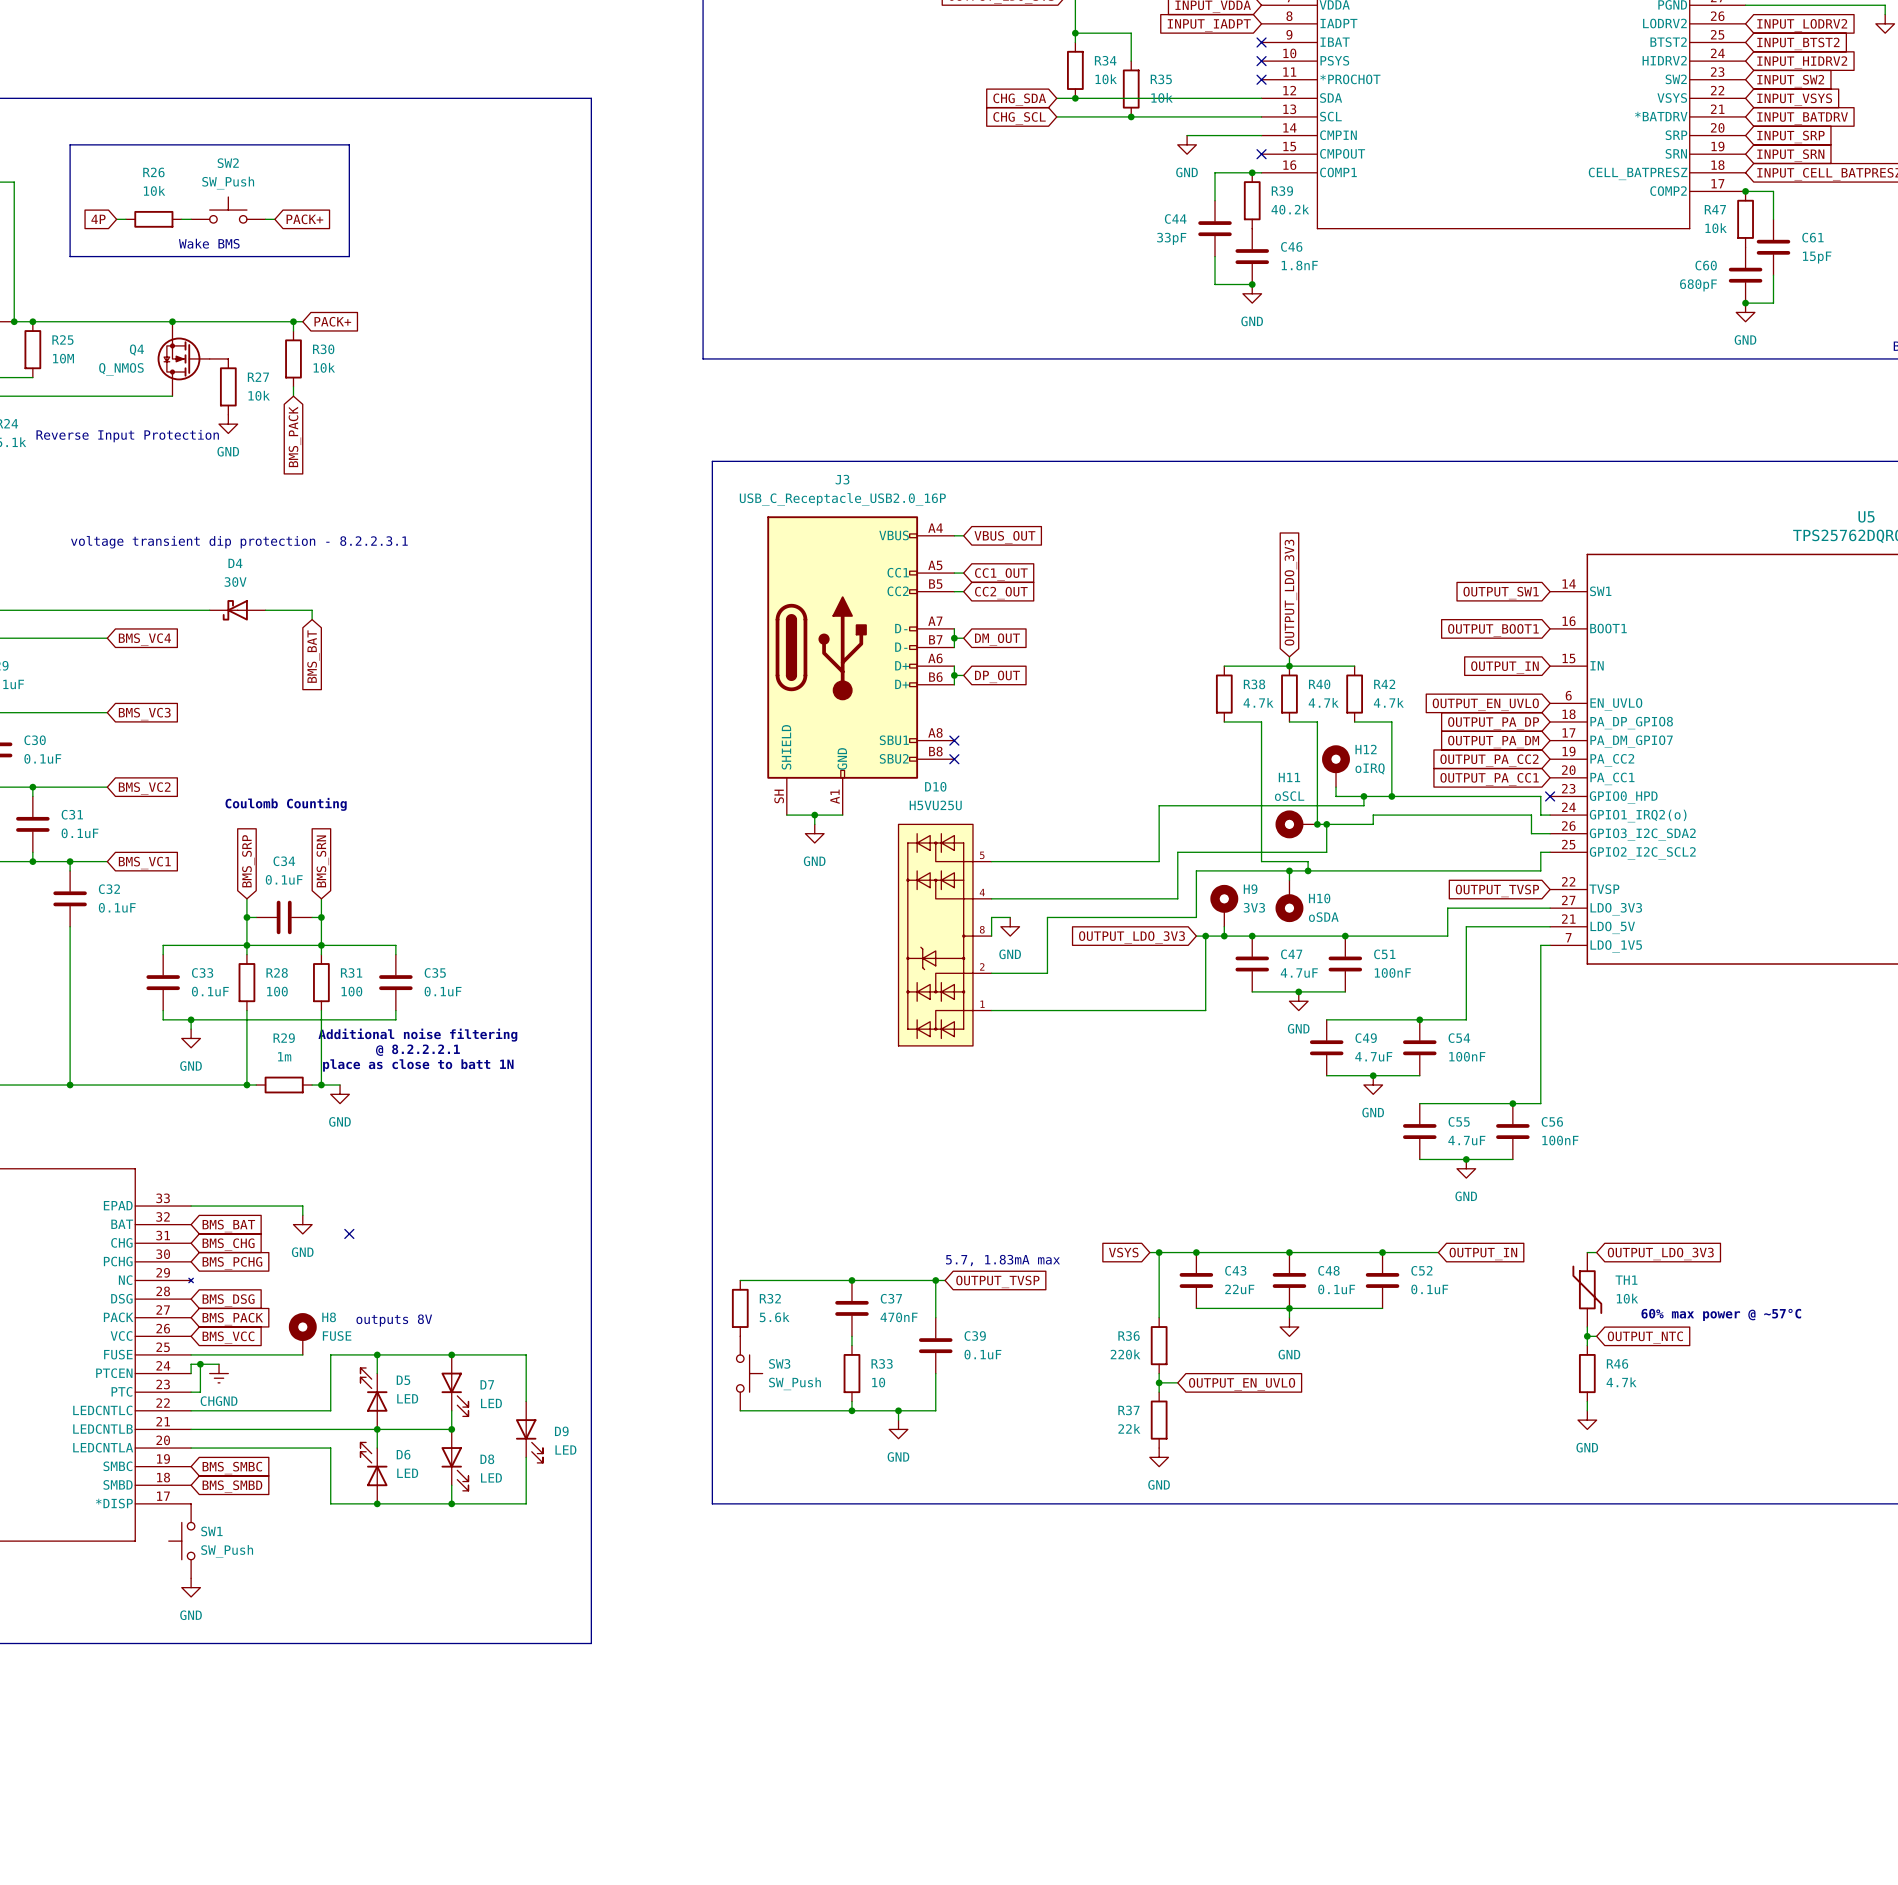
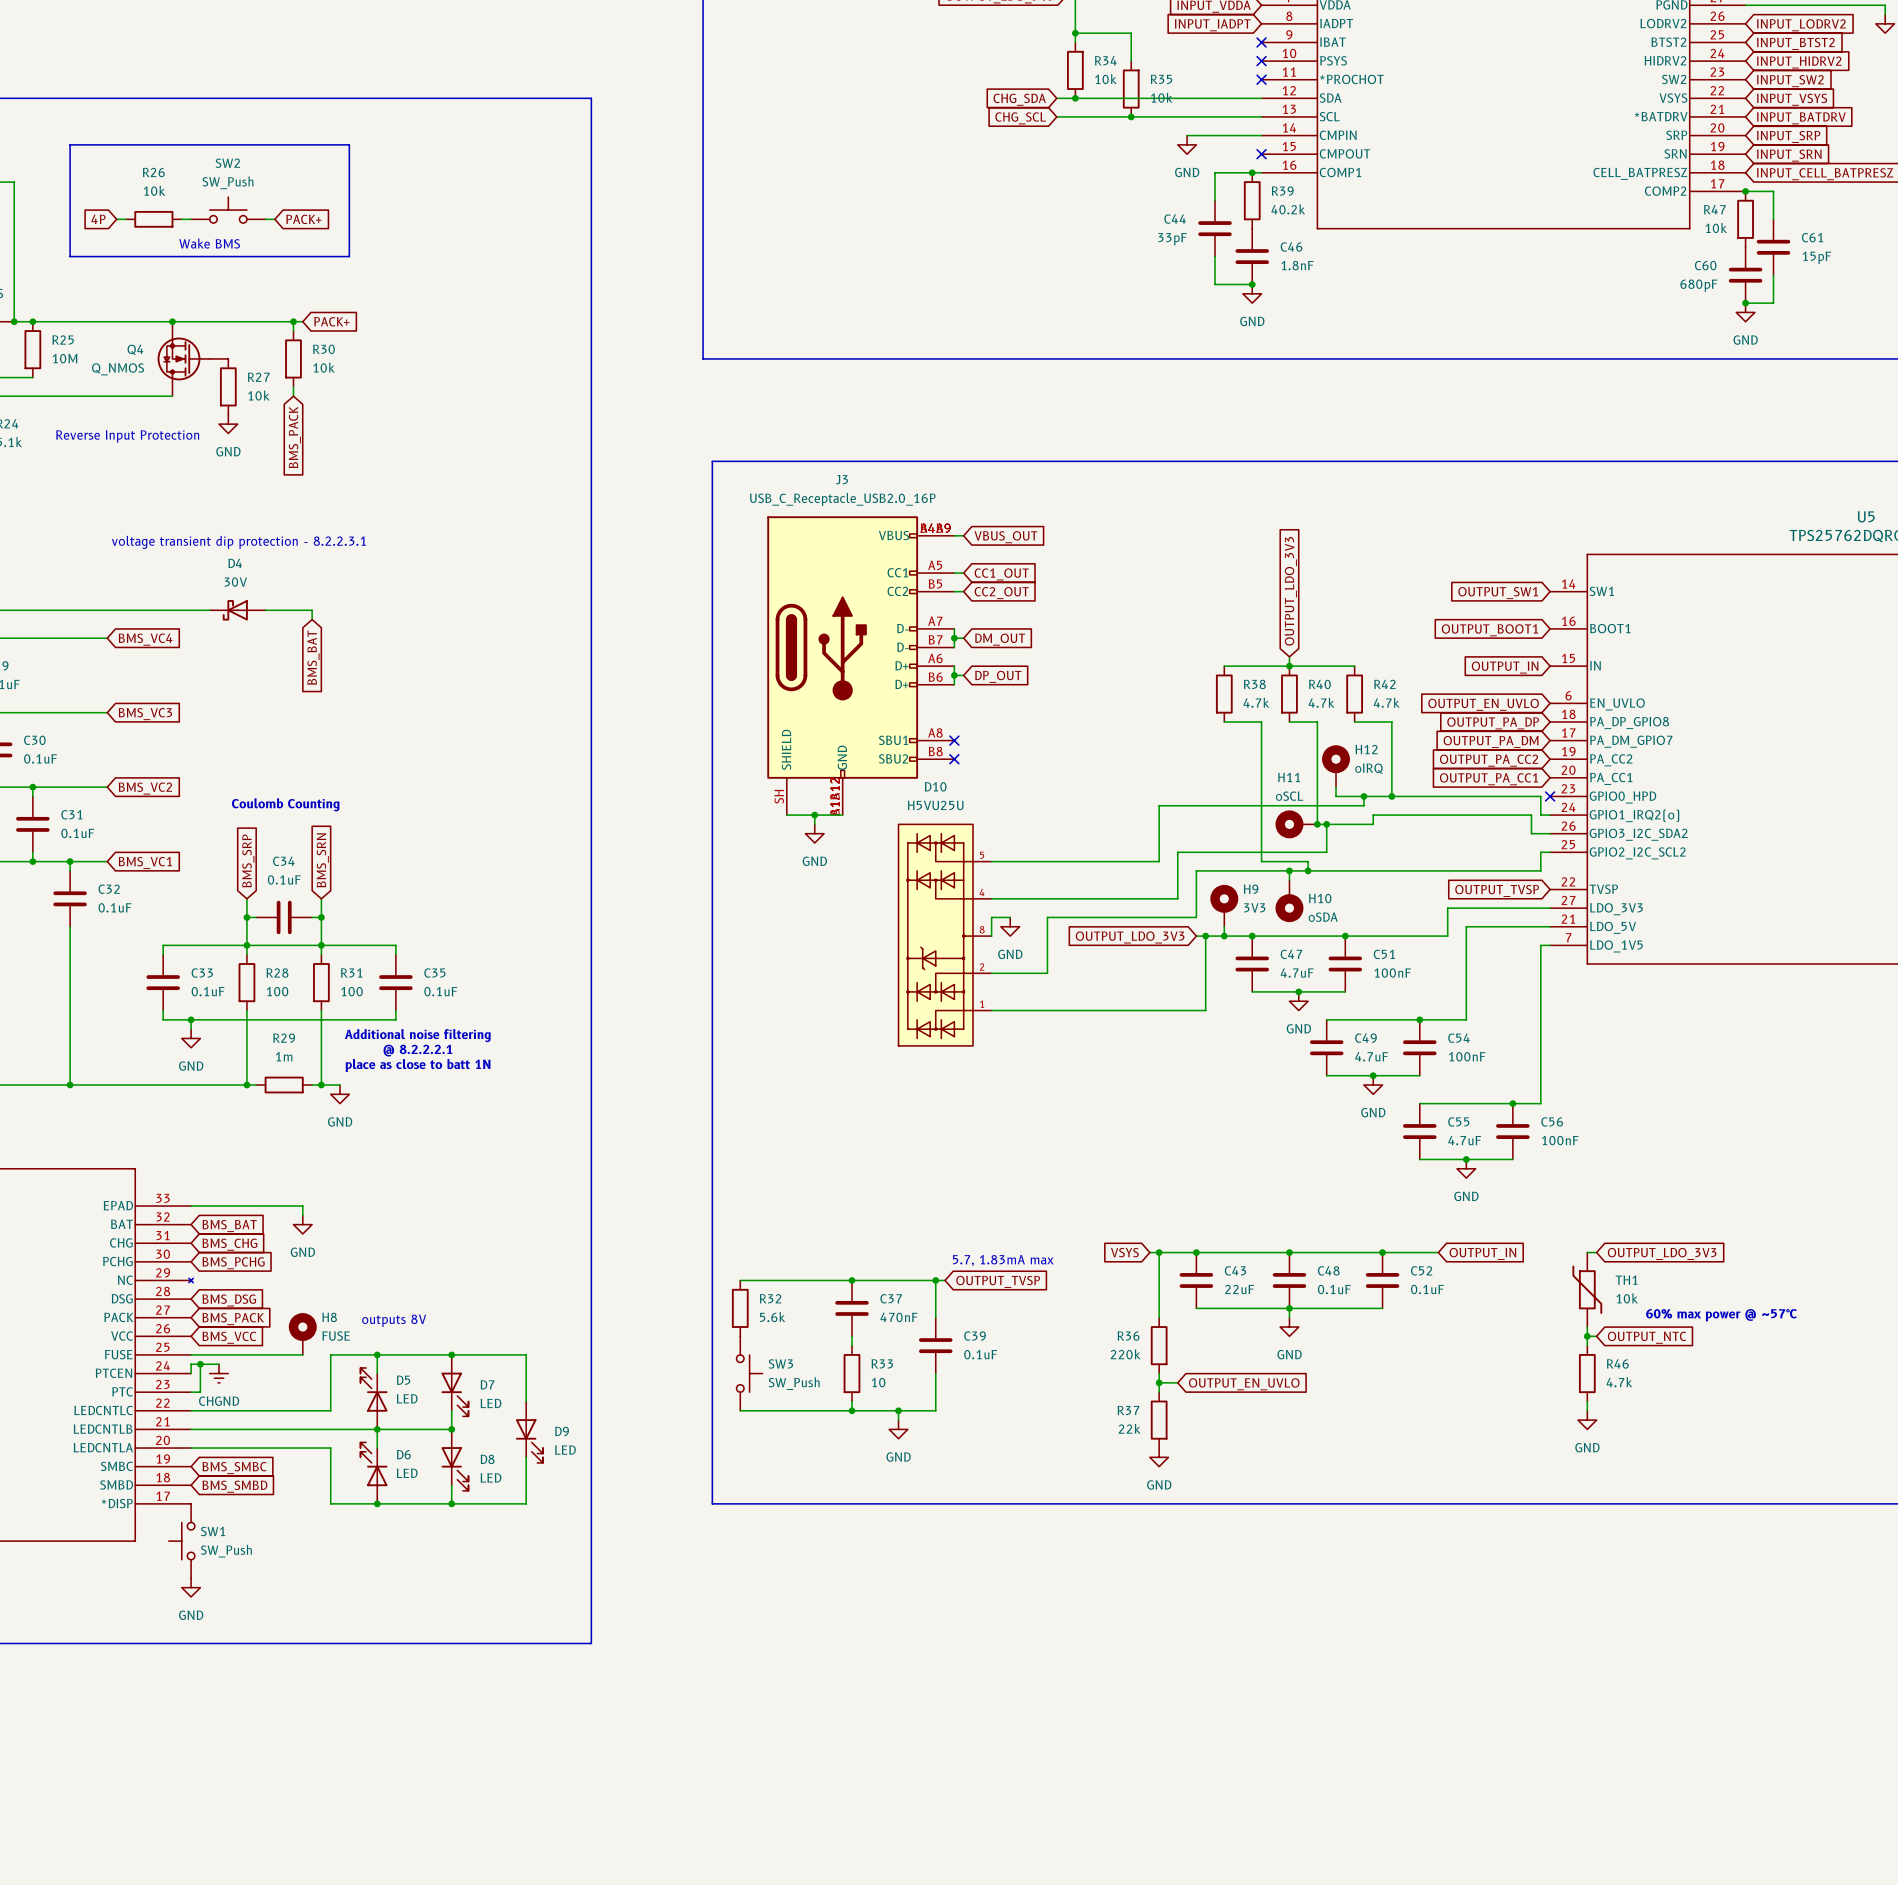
J3 symbol: [767, 516, 955, 816] -> [767, 516, 955, 816]
no-connect mark: (349, 1233) -> none

